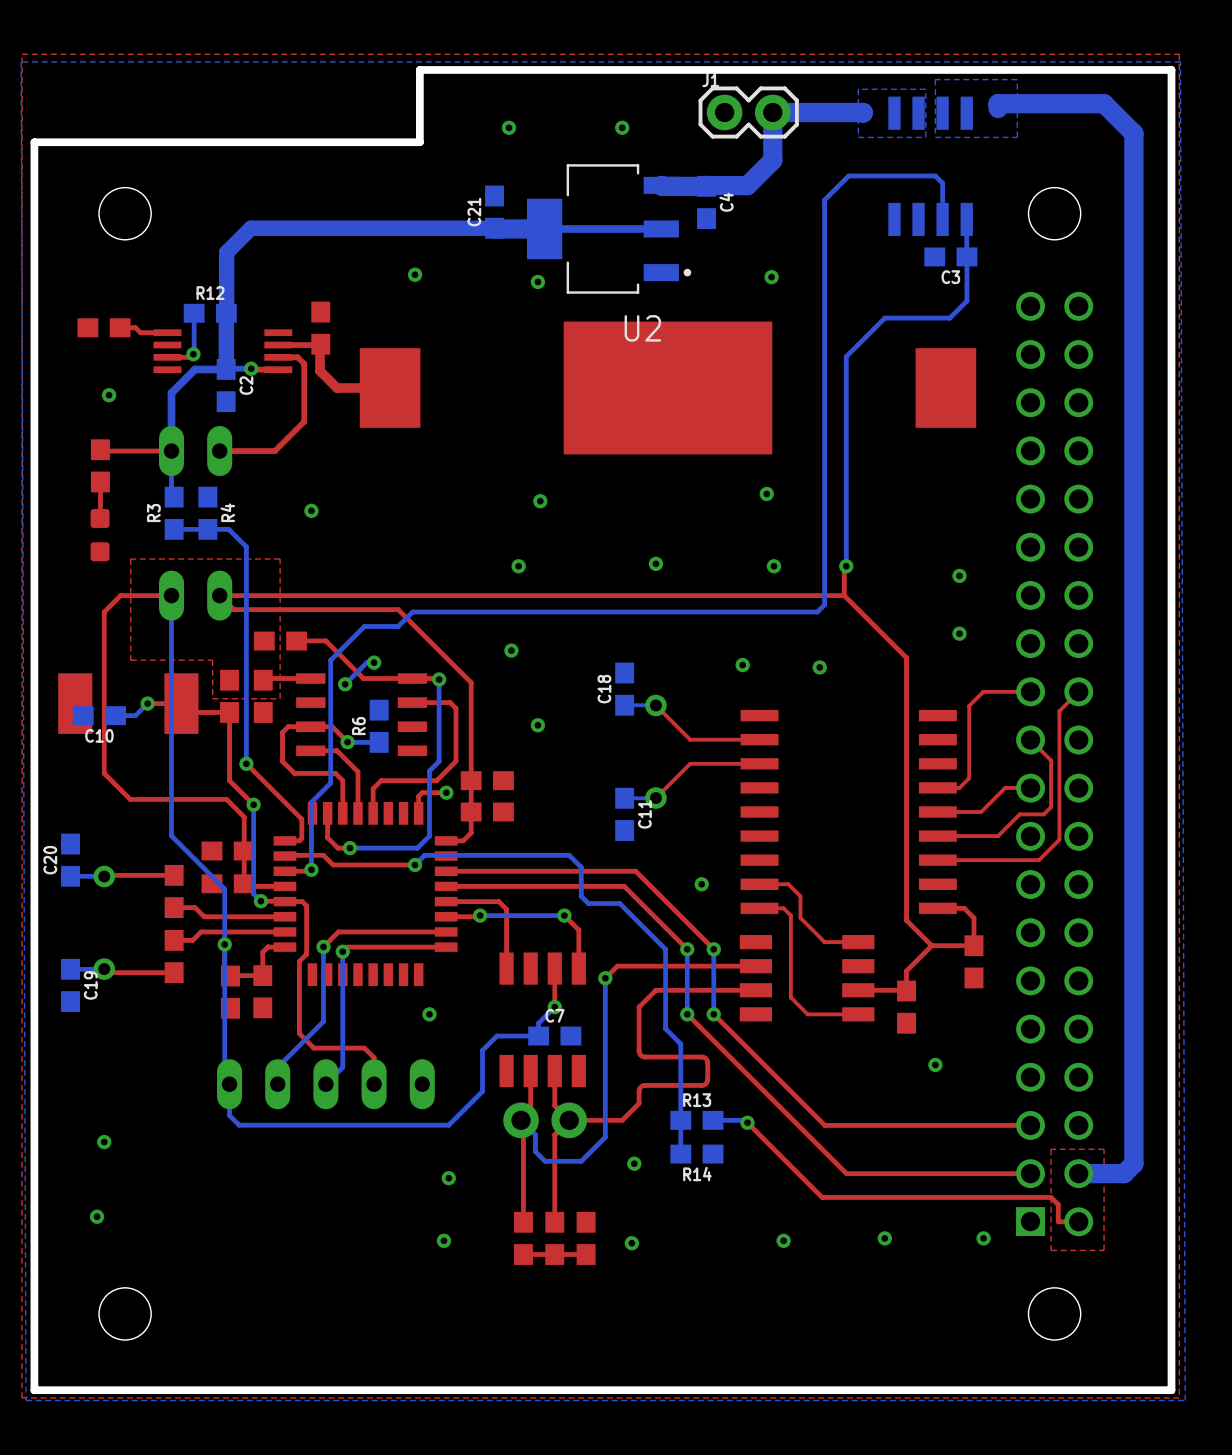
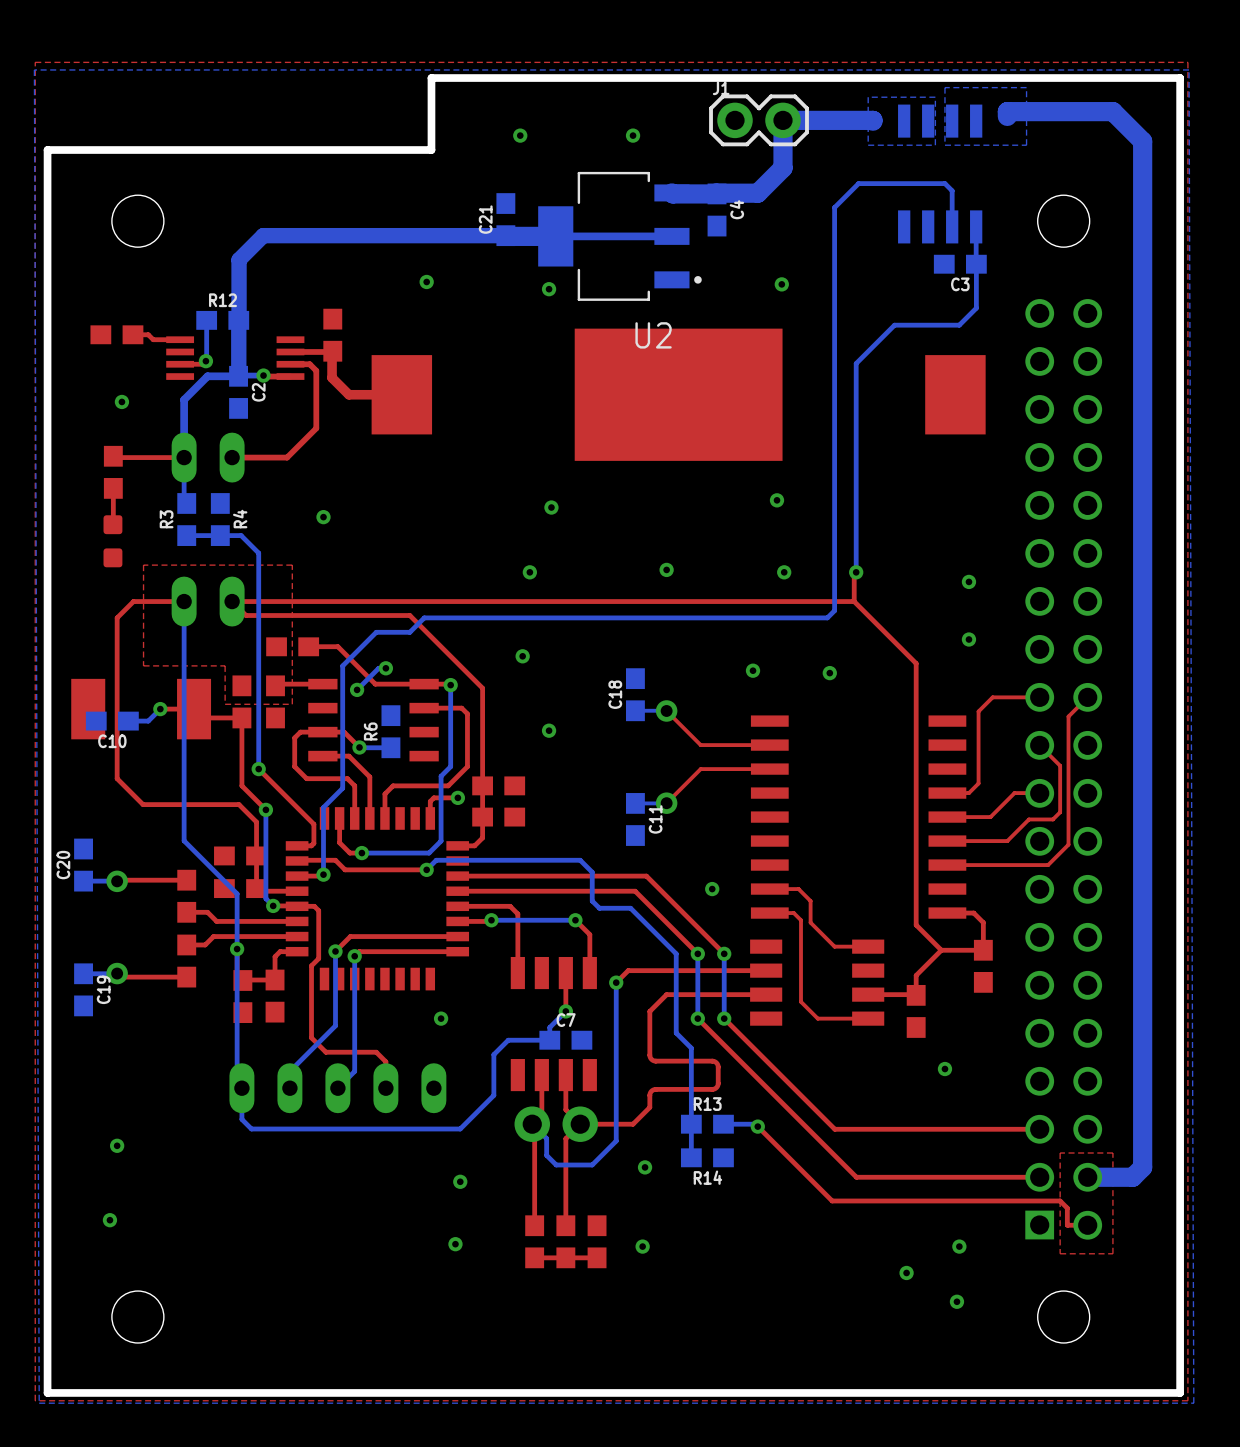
via: (884, 1238) -> none
via: (983, 1238) -> none
via: (783, 1240) -> none
via: none -> (959, 1246)
via: none -> (906, 1272)
via: none -> (956, 1301)

